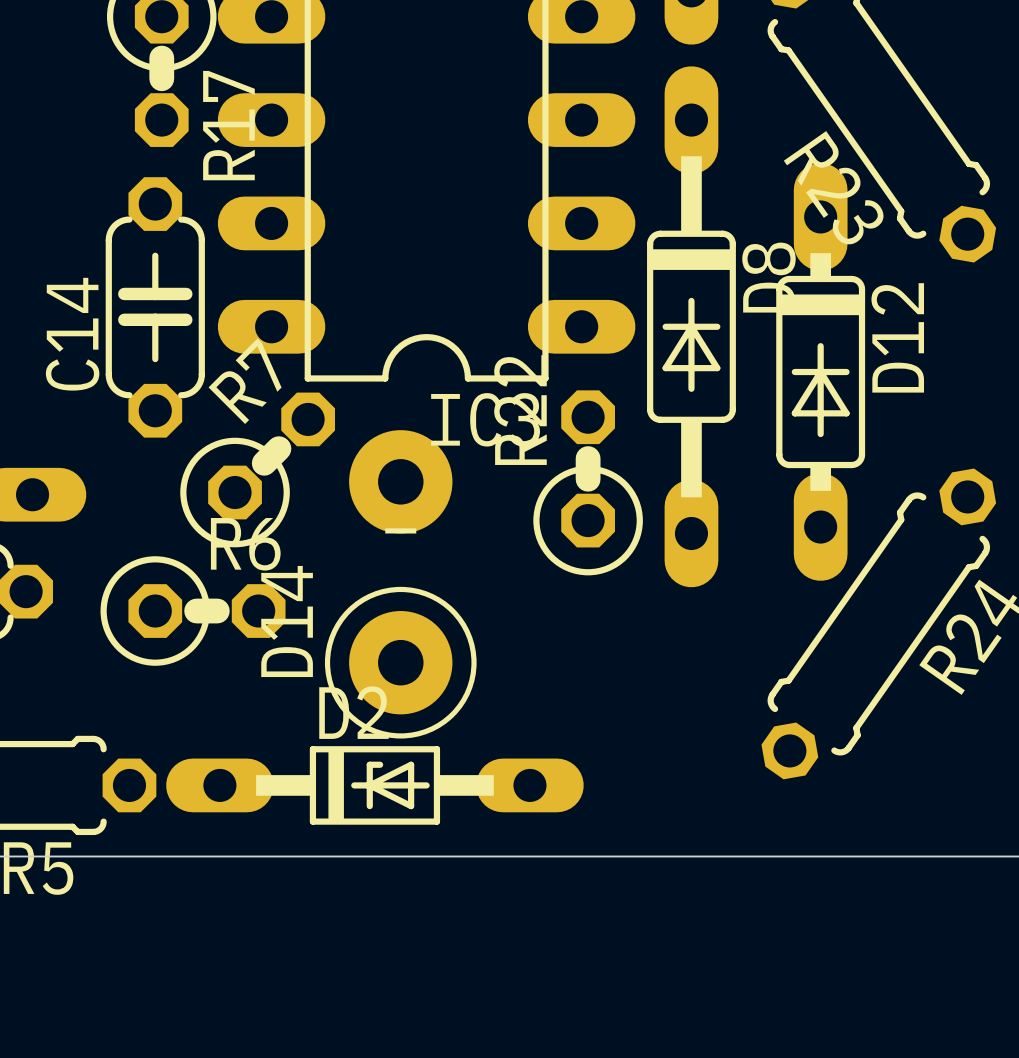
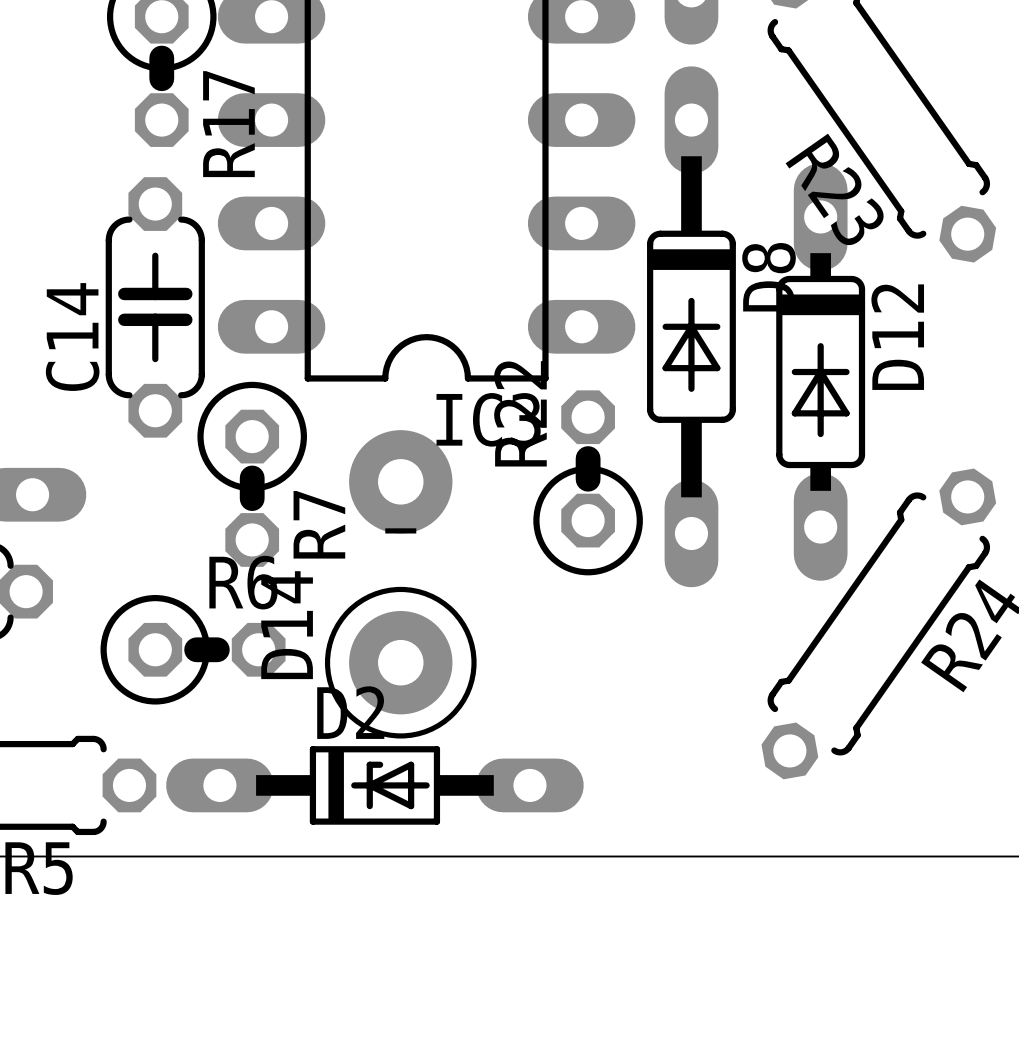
R7 rotation: 0° (257, 469) -> 135° clockwise (252, 474)
R6 position: (193, 611) -> (193, 649)

